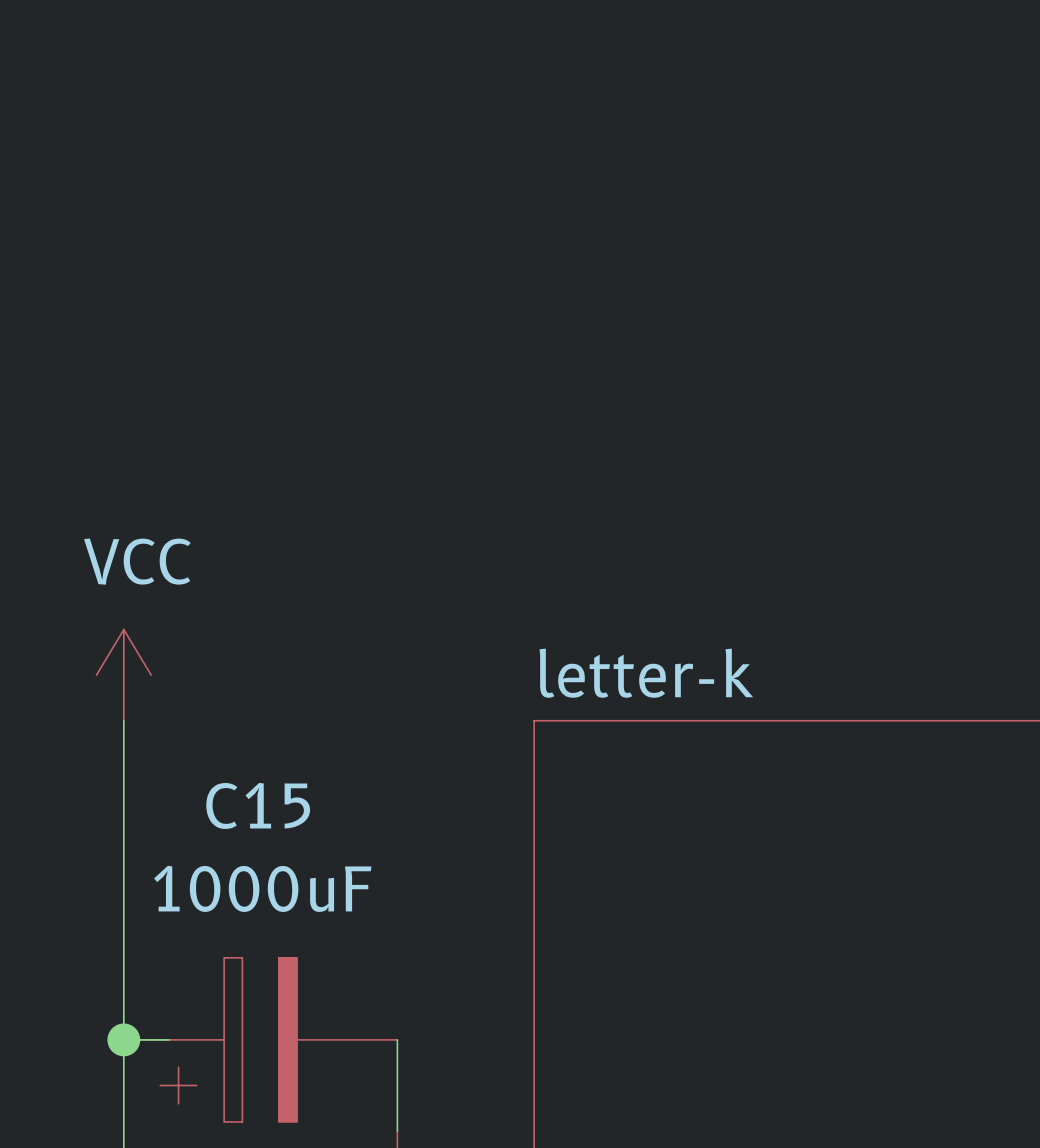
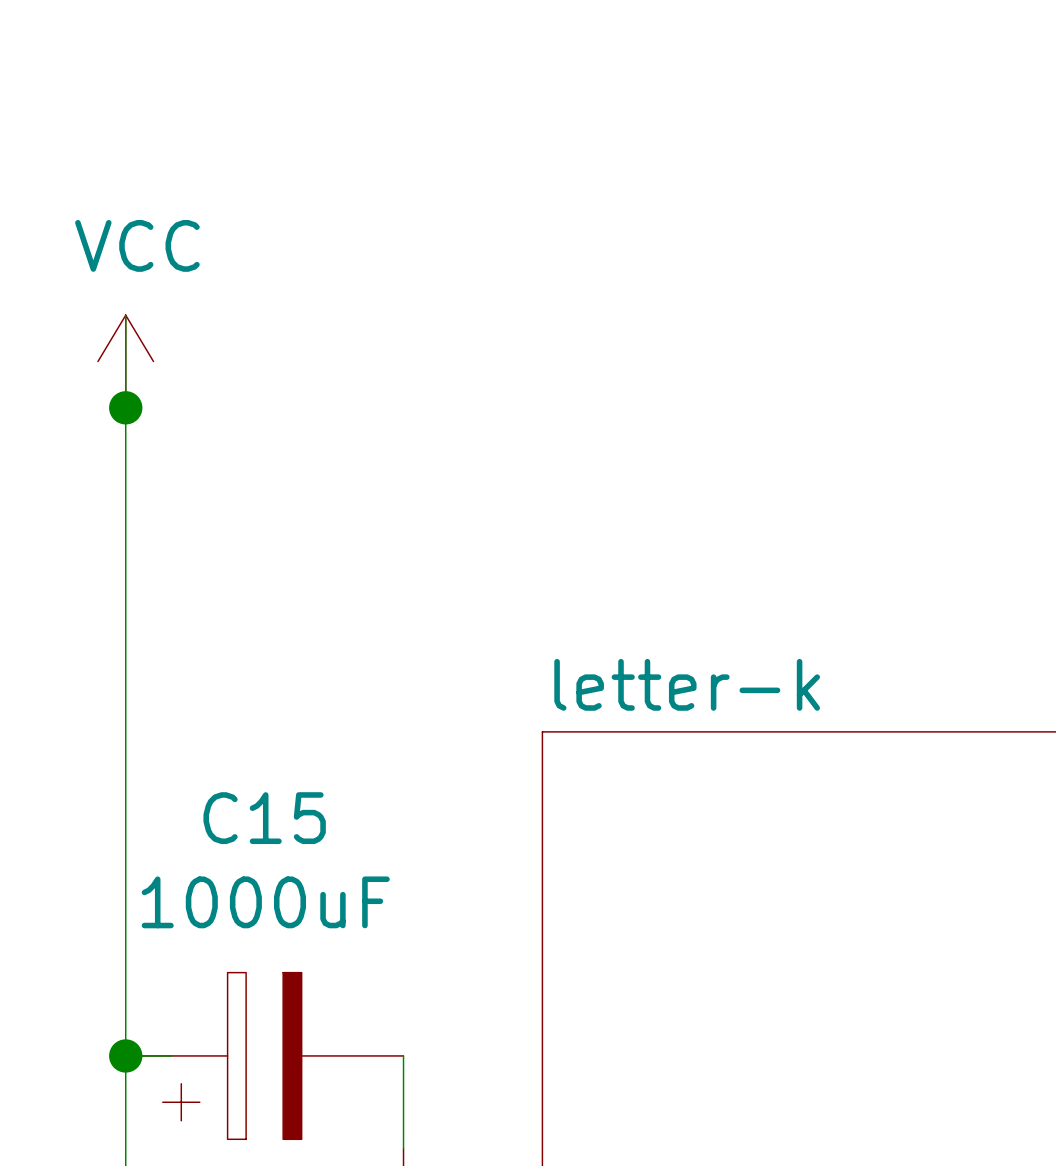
wire: none -> (125, 315) (125, 731)
junction: none -> (125, 407)
power symbol position: VCC (123, 675) -> VCC (125, 361)

